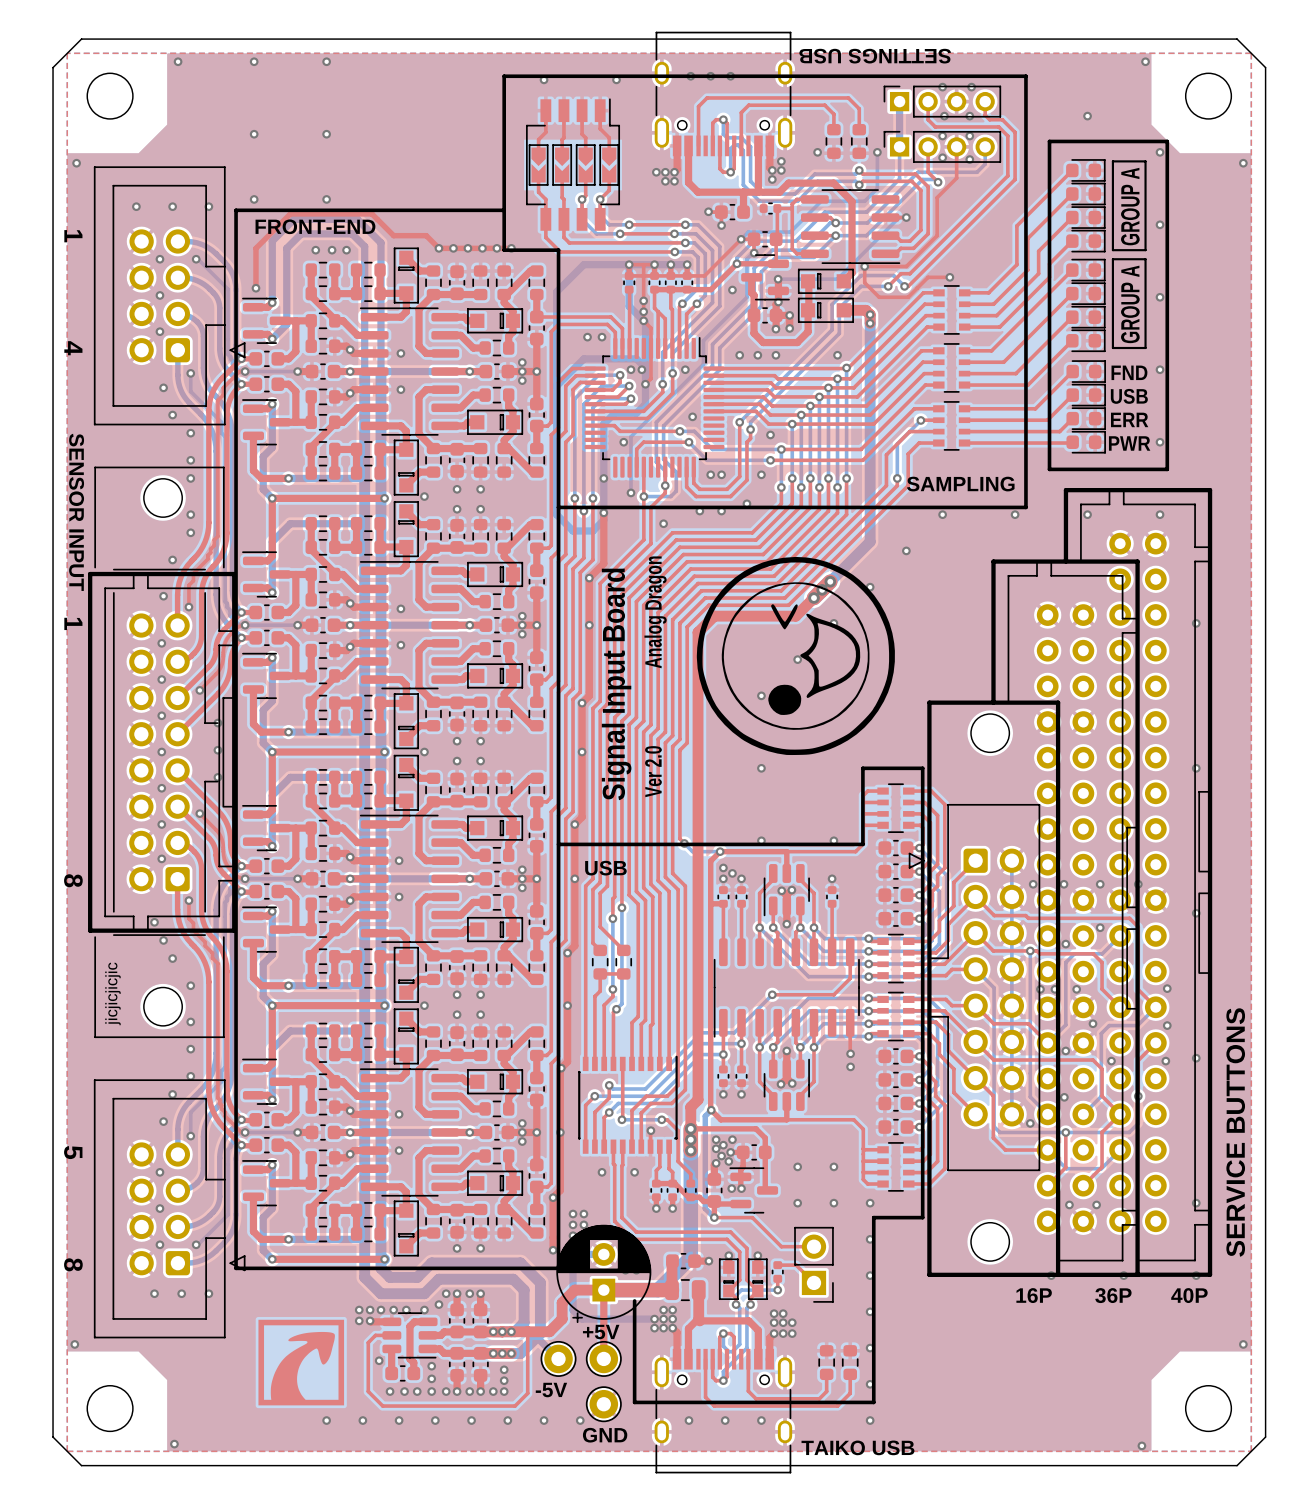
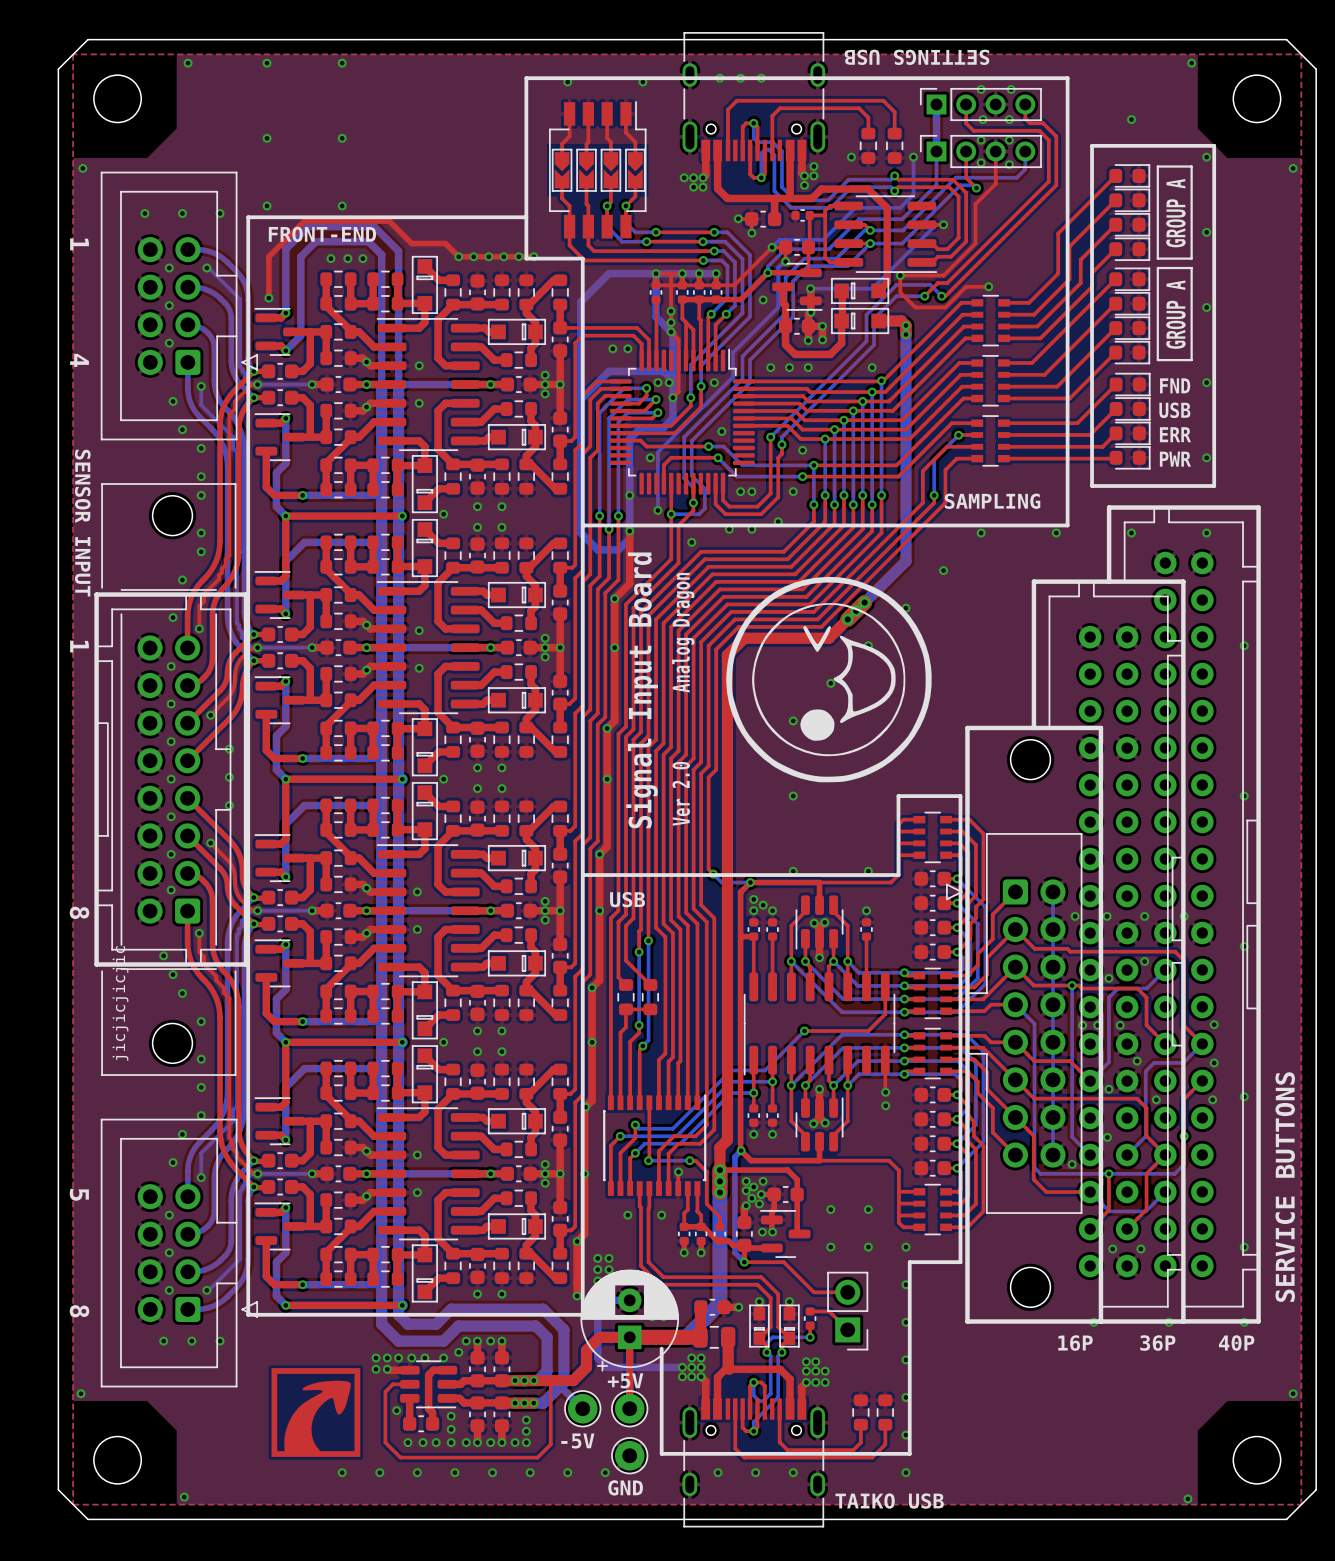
part footprint: [88, 466, 237, 1039] -> [94, 483, 249, 1076]

